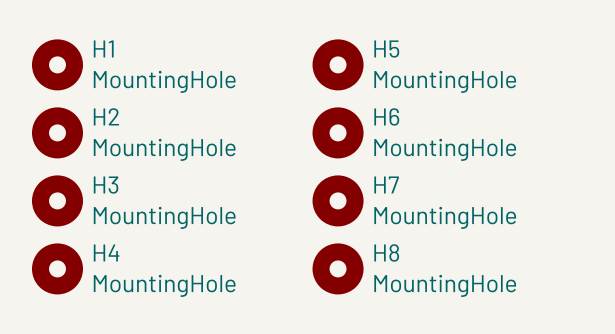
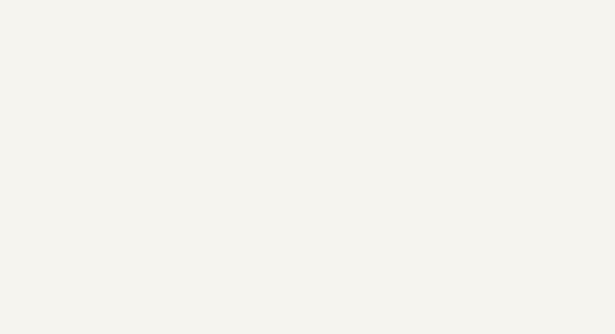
H1: MountingHole (57, 64) -> none
H5: MountingHole (338, 64) -> none
H2: MountingHole (57, 132) -> none
H6: MountingHole (338, 132) -> none
H3: MountingHole (57, 200) -> none
H7: MountingHole (338, 200) -> none
H4: MountingHole (57, 268) -> none
H8: MountingHole (338, 268) -> none

